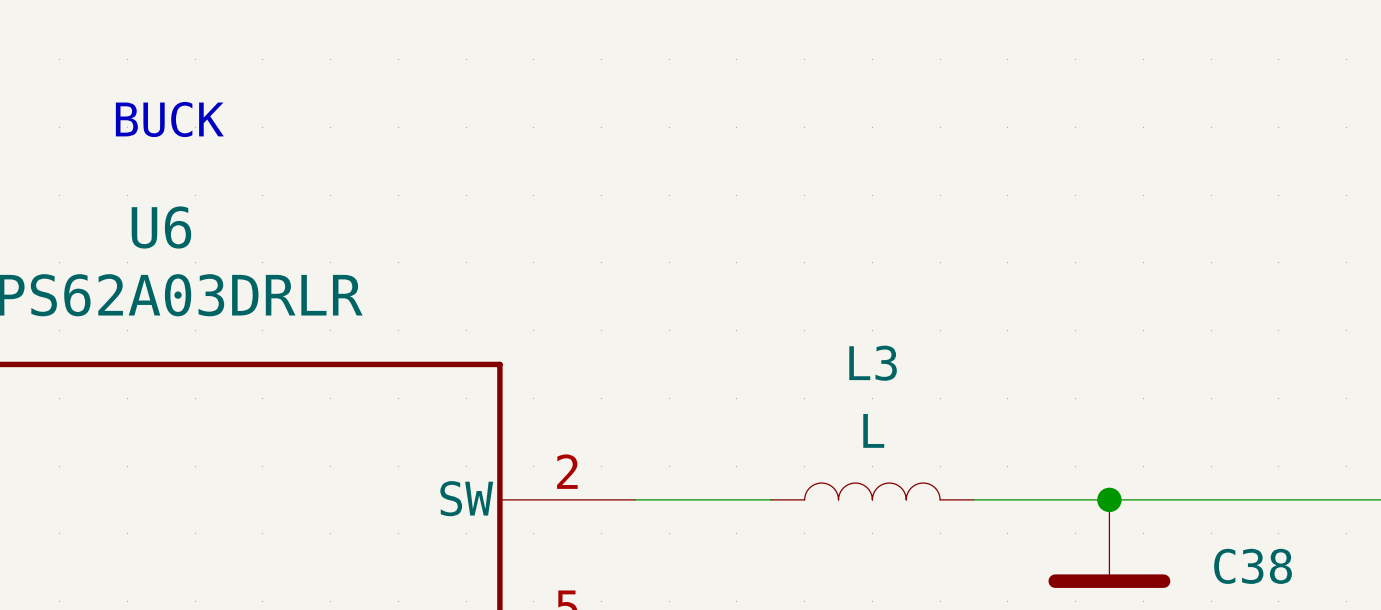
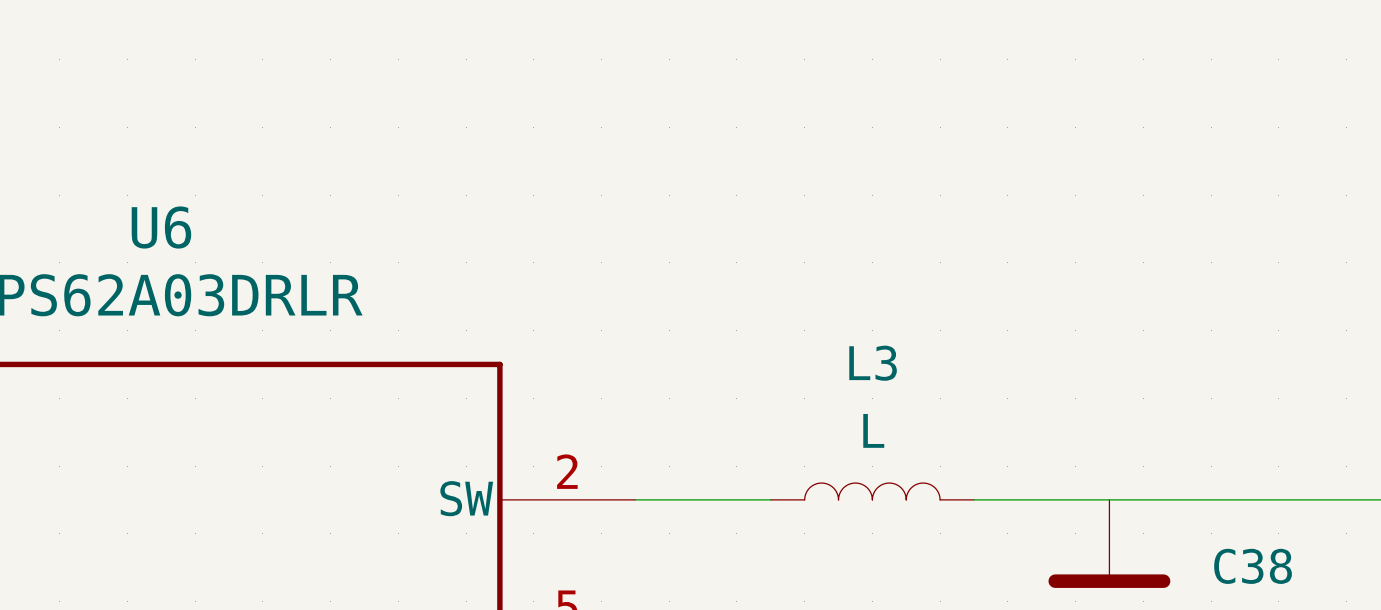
text: BUCK (169, 119) -> none
junction: (1109, 499) -> none

